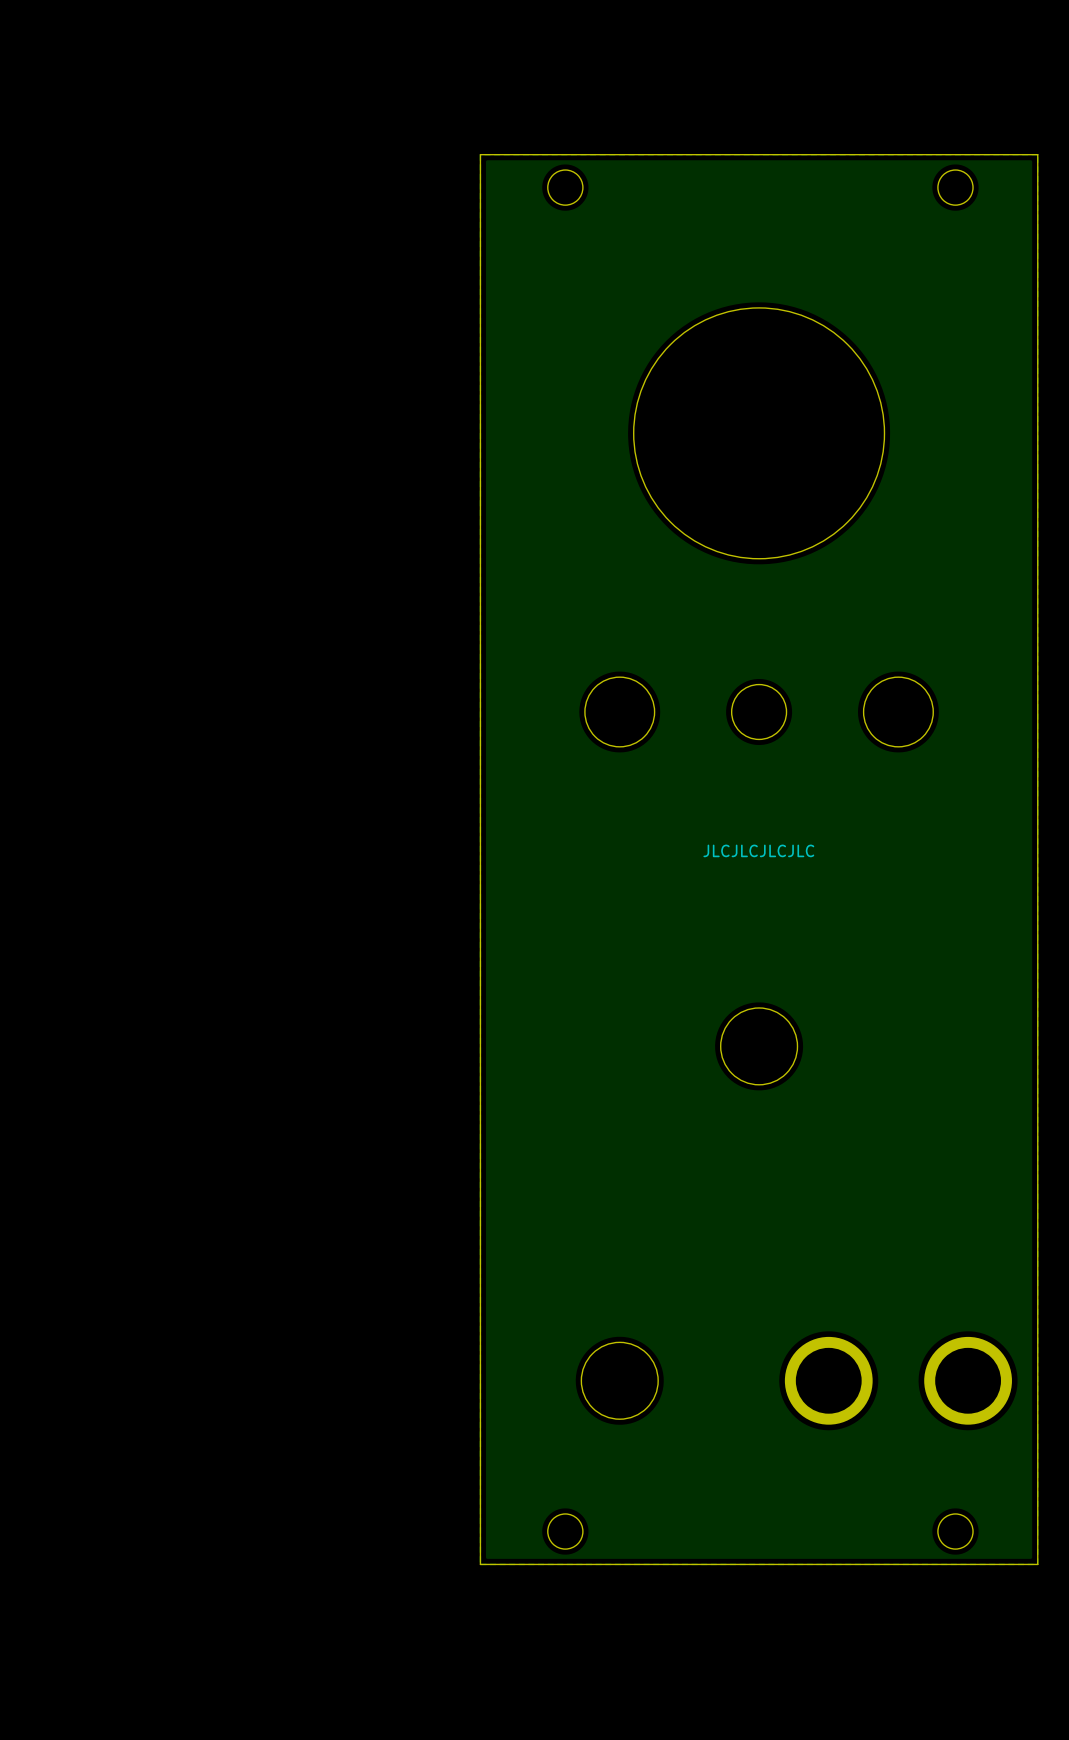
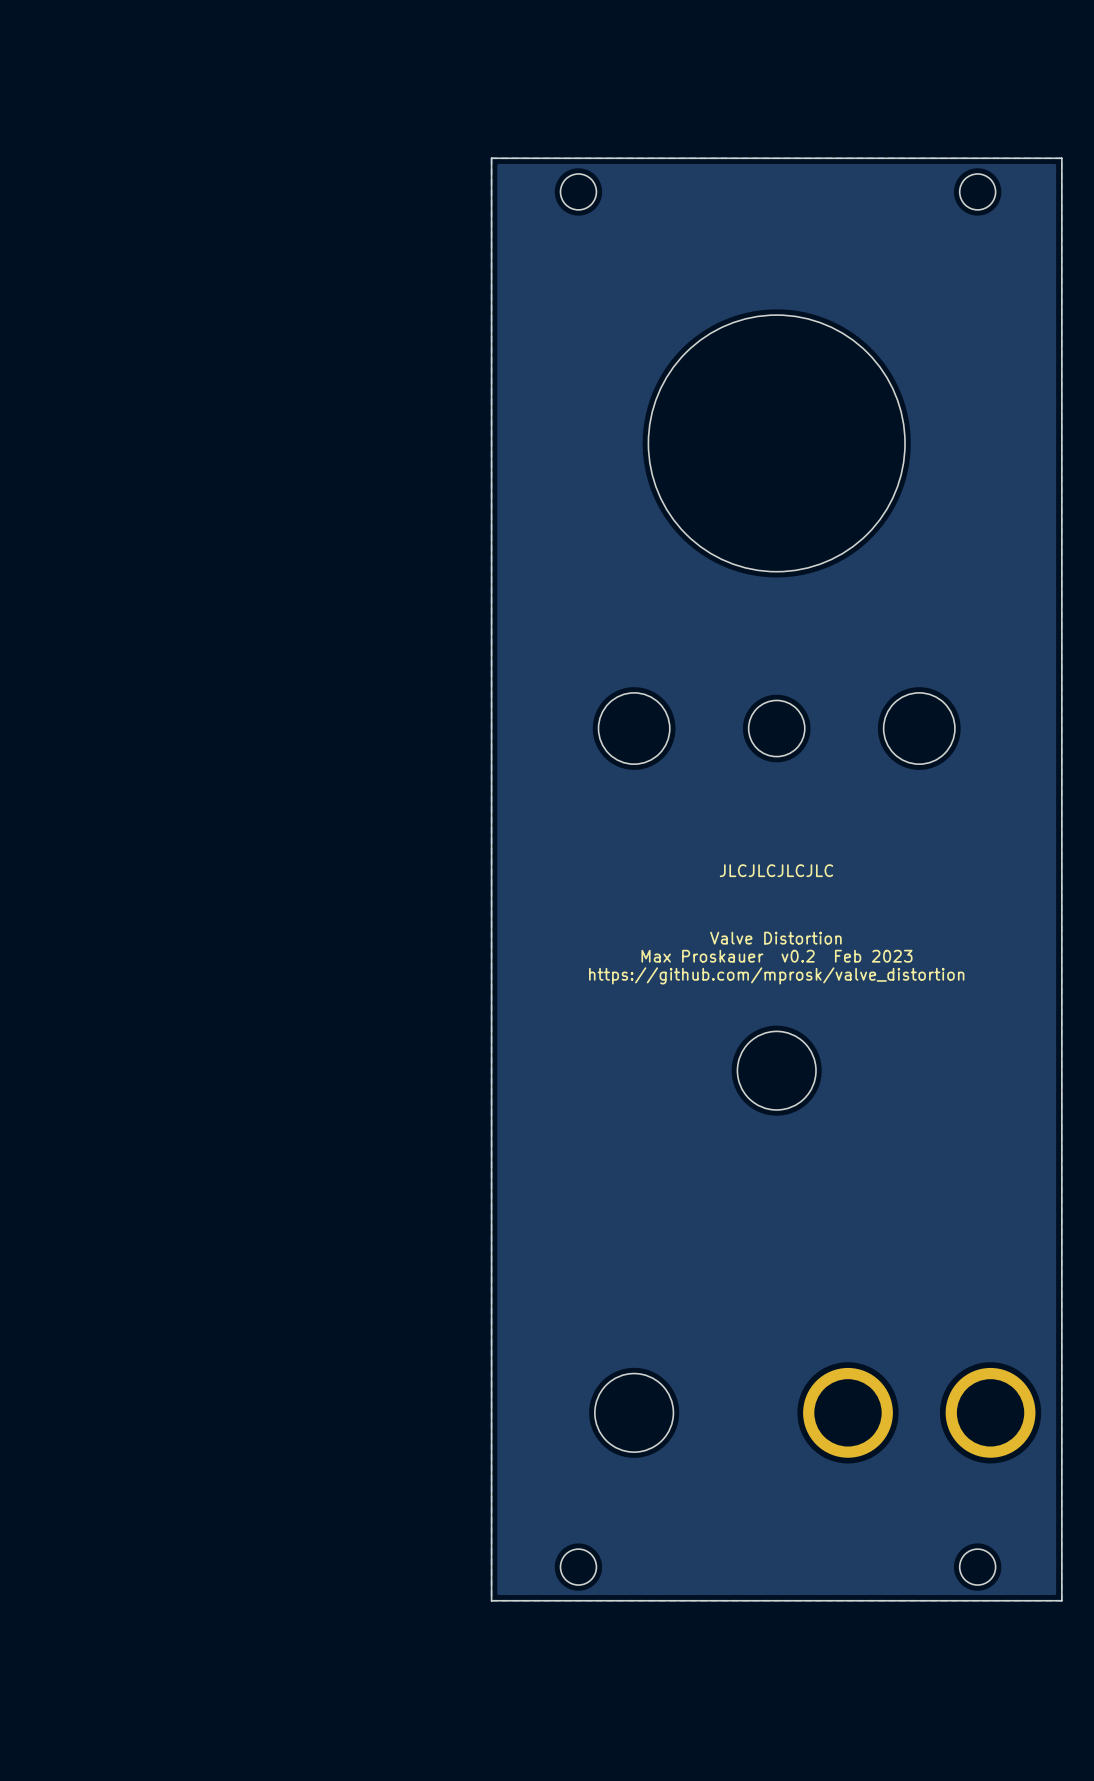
text: none -> Valve Distortion (775, 938)
text: none -> Max Proskauer v0.2 Feb 2023 (776, 956)
text: none -> https://github.com/mprosk/valve_distortion (776, 975)

